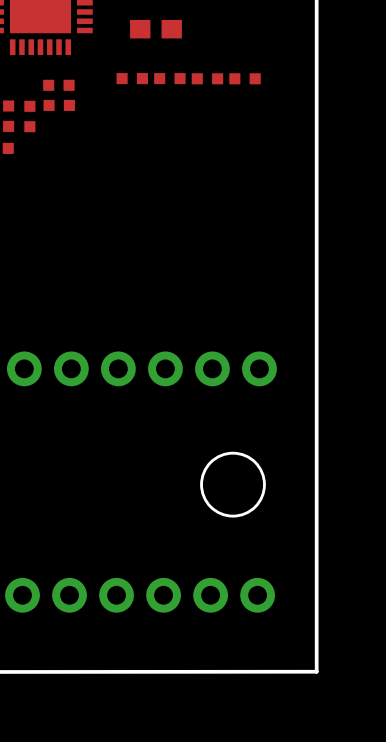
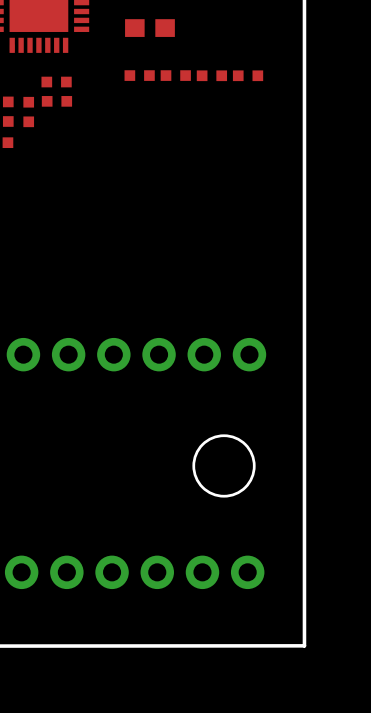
part: (132, 78) -> none
part: none -> (139, 75)
part: (169, 78) -> none
part: none -> (175, 75)
part: (207, 78) -> none
part: none -> (211, 75)
part: (245, 78) -> none
part: none -> (248, 75)

